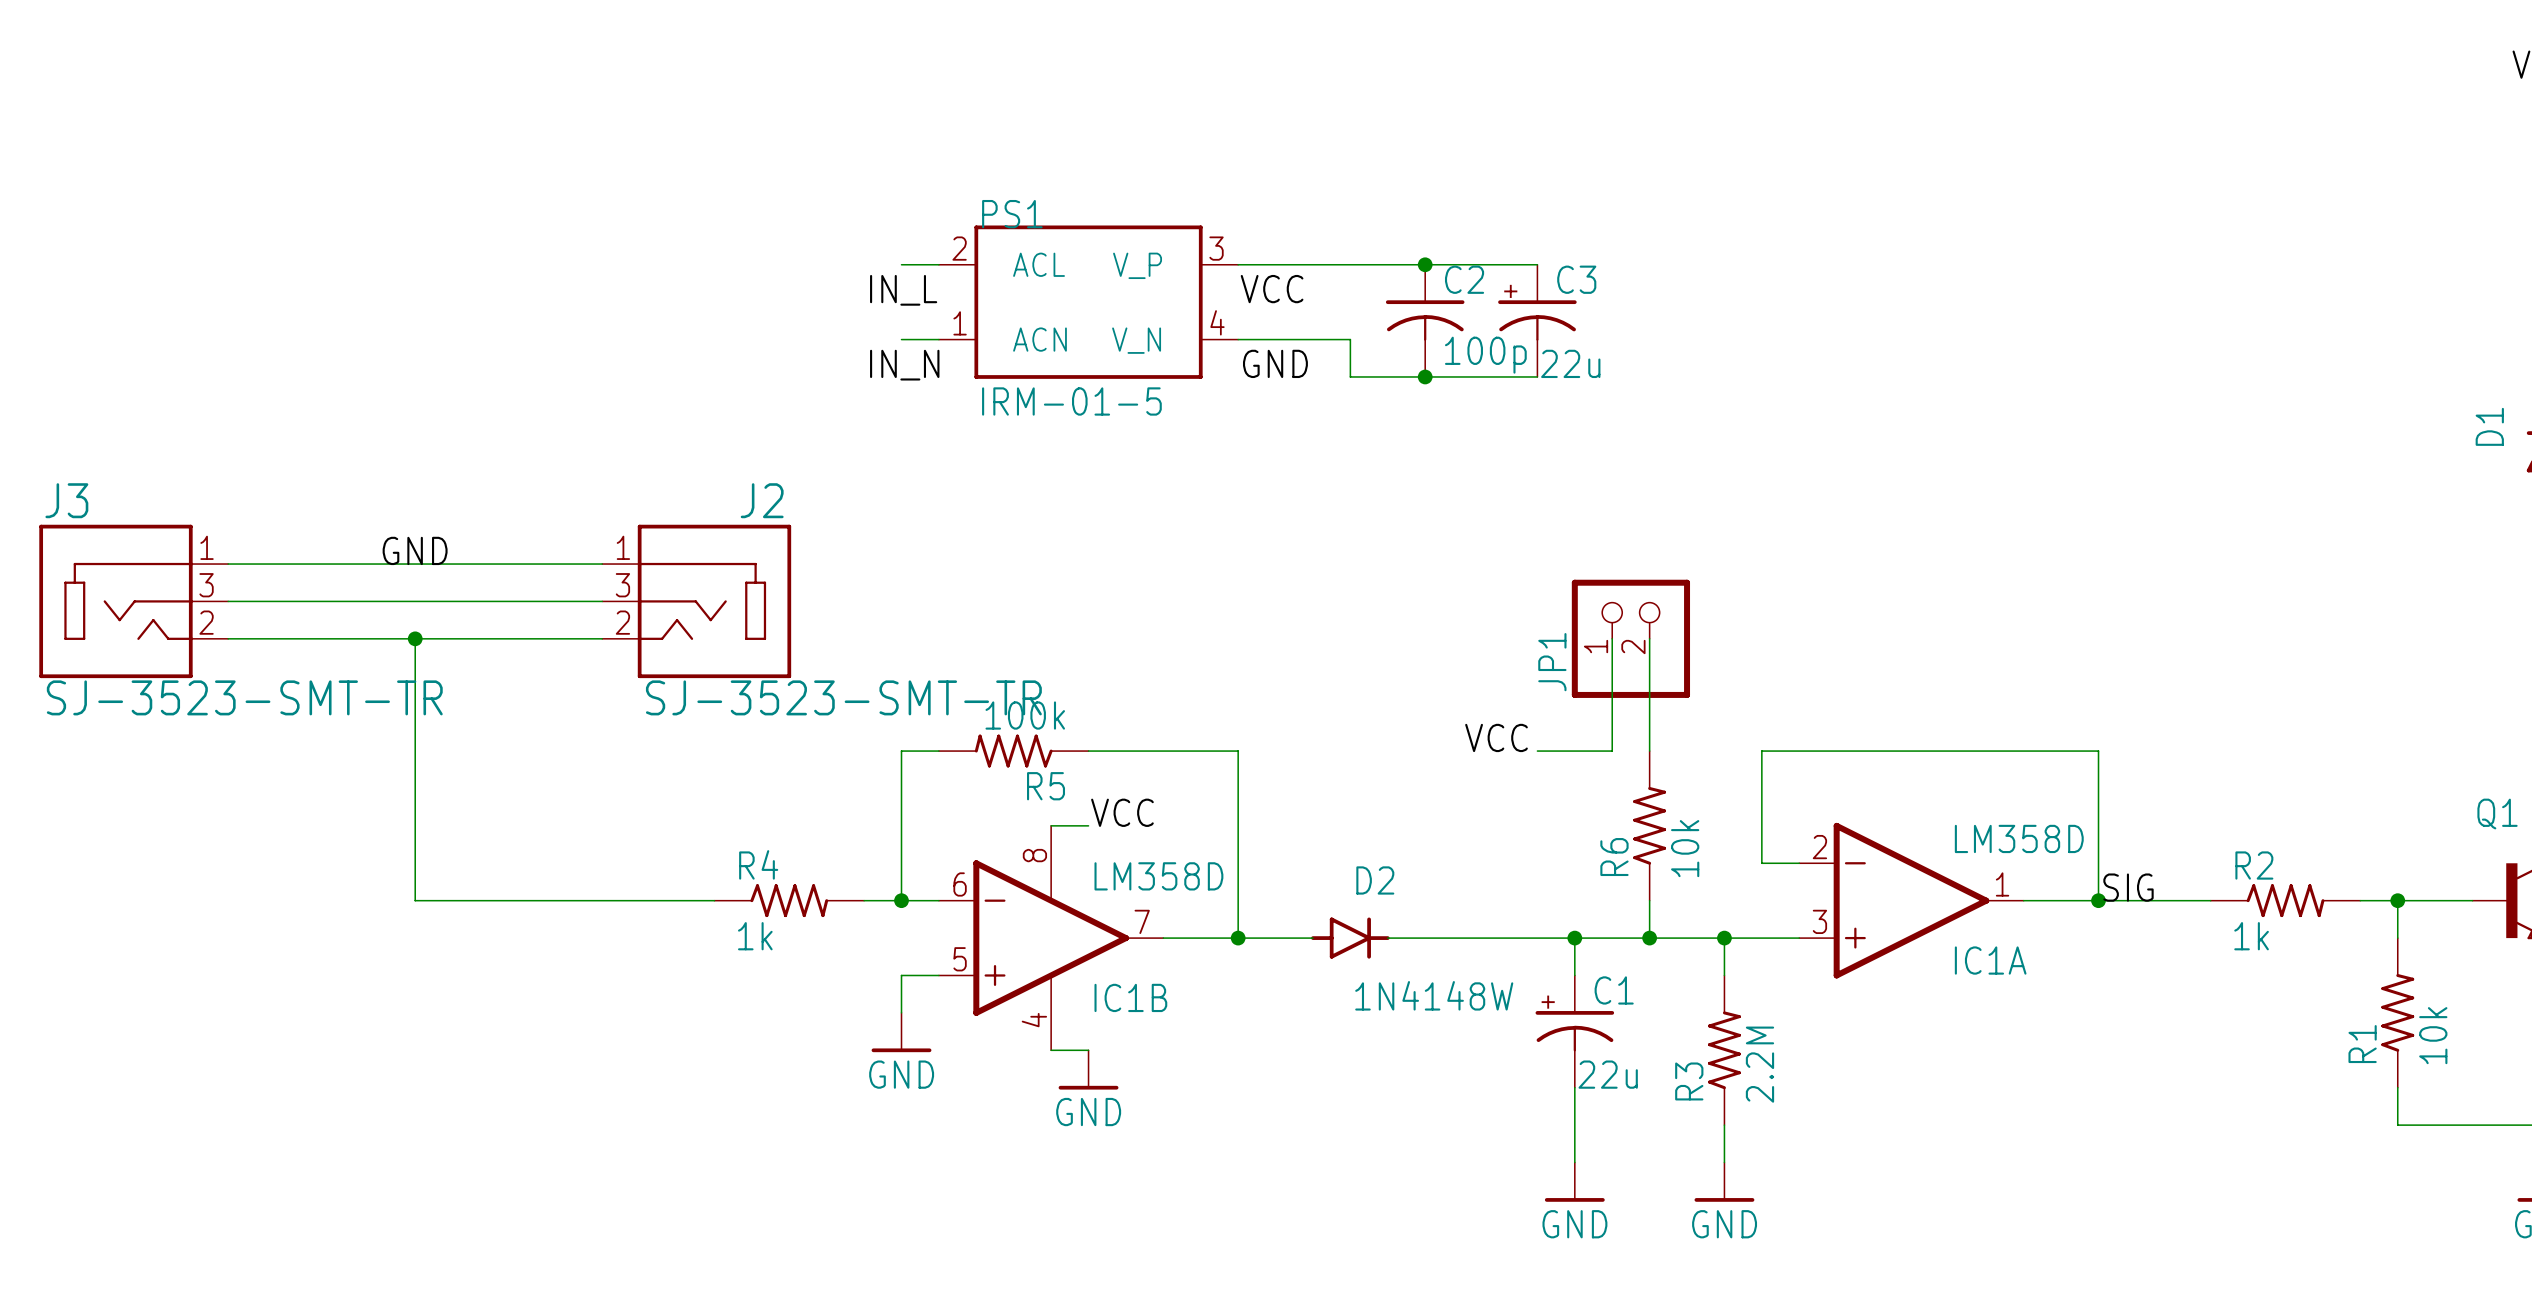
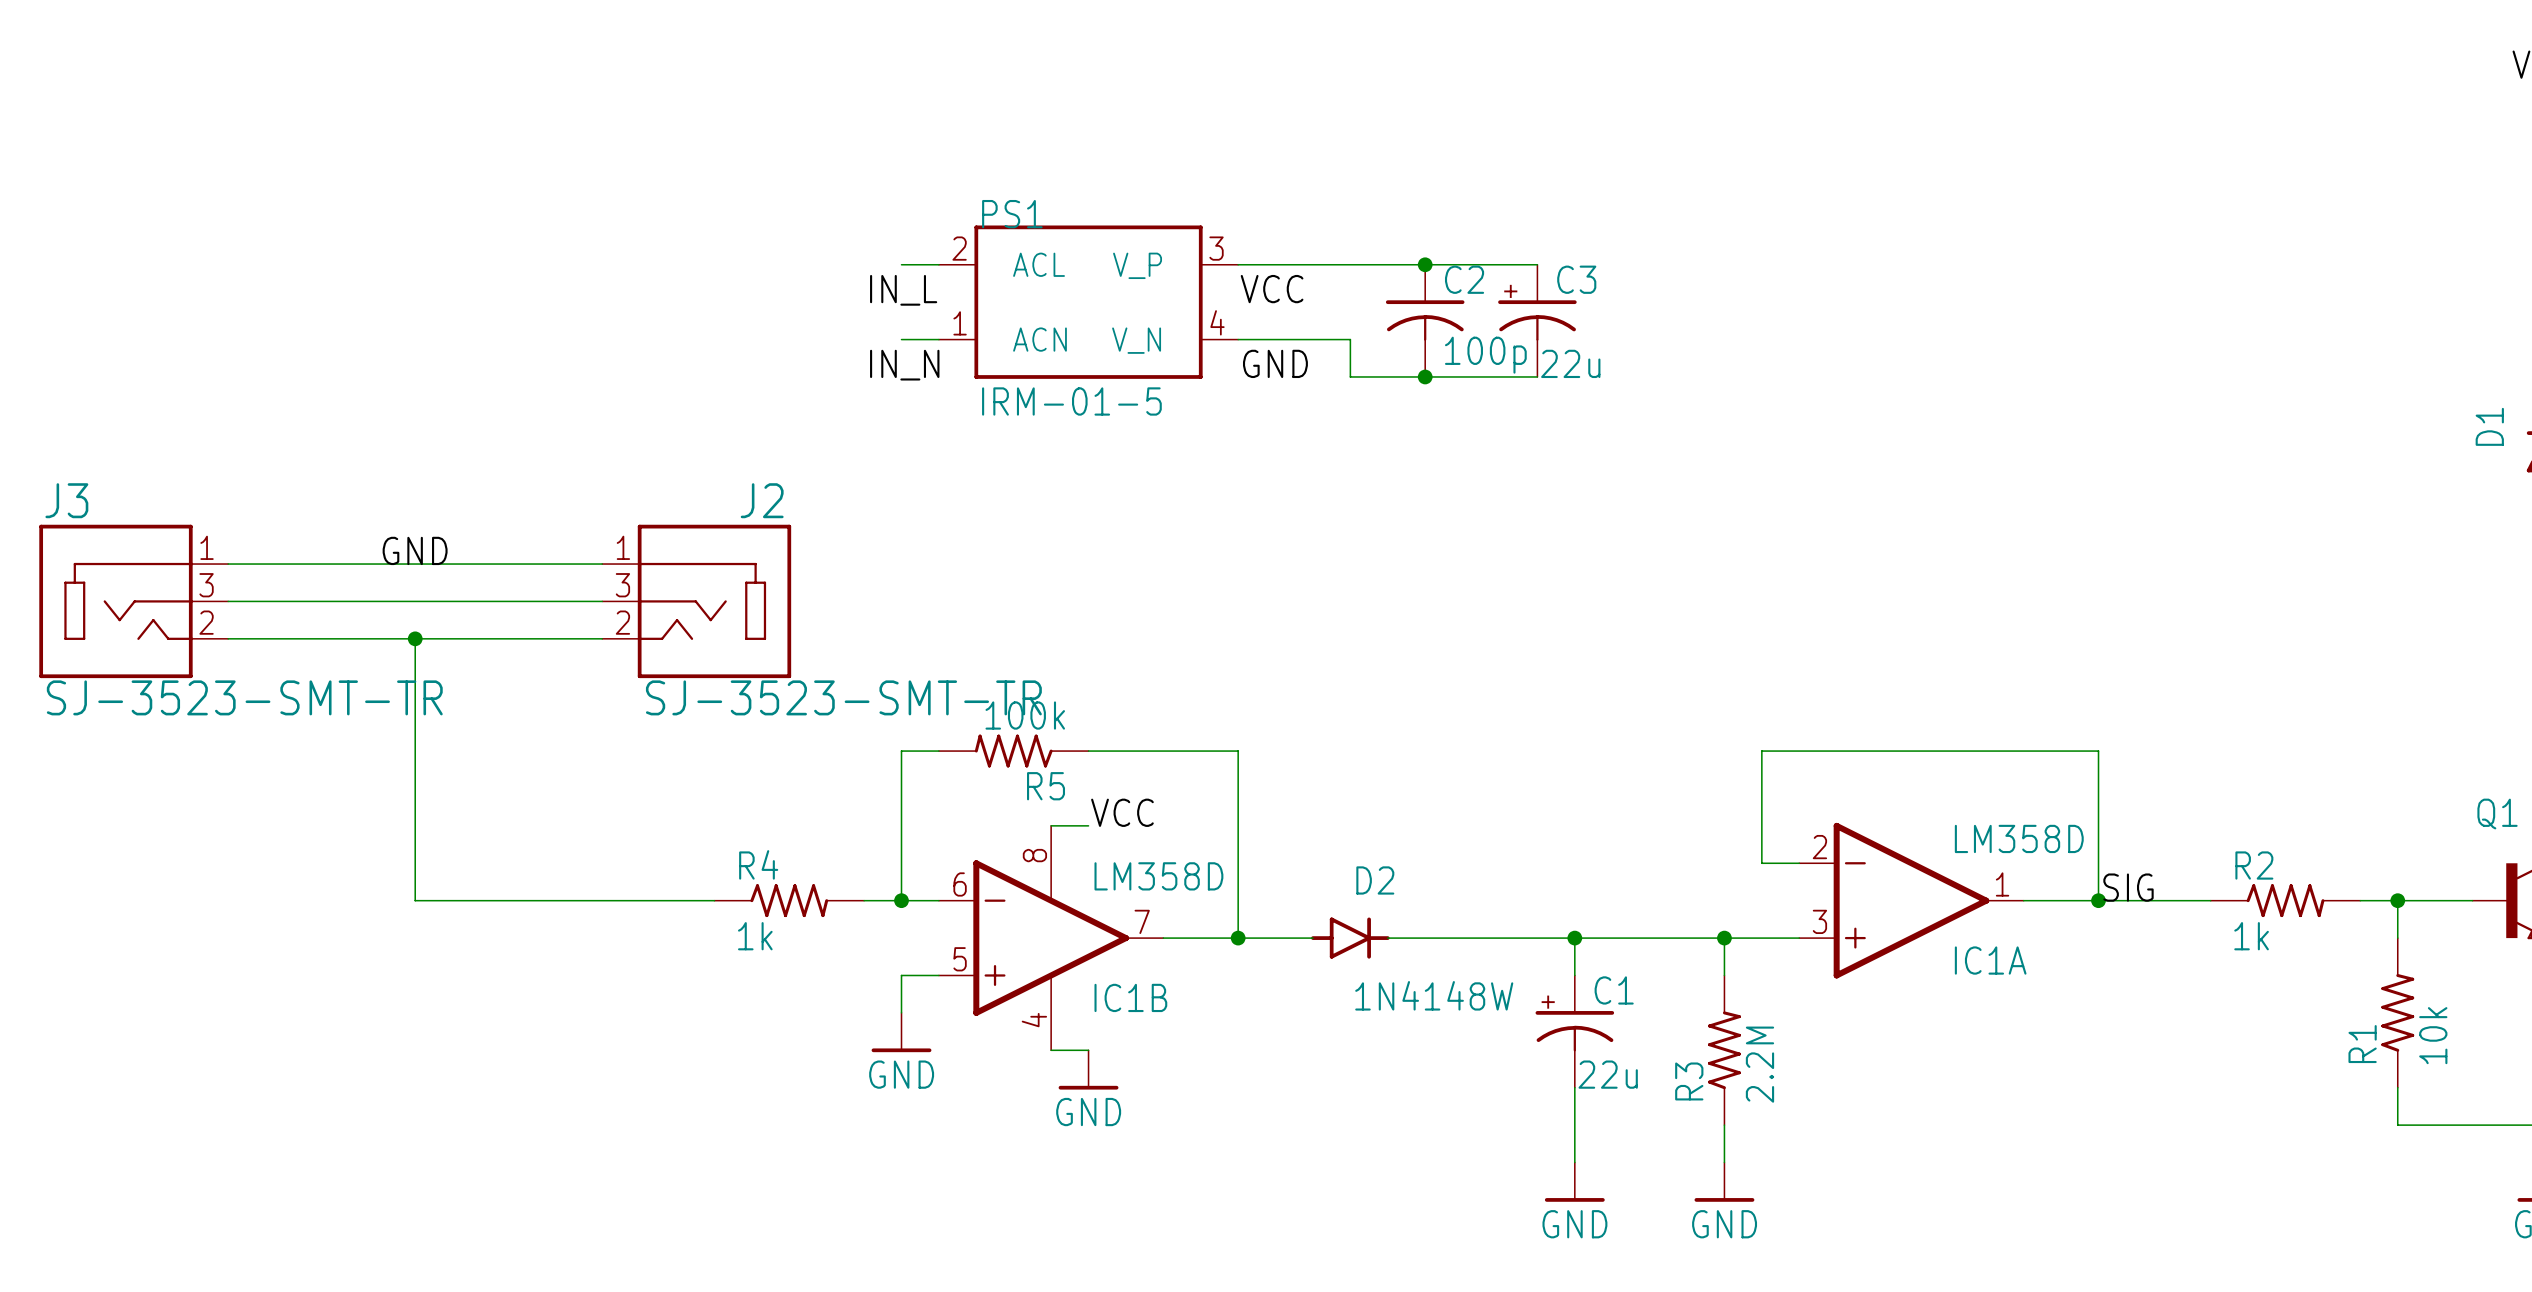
wire: (1612, 638) (1612, 751) (1537, 751) -> none
JP1: (1630, 638) -> none
wire: (1649, 638) (1649, 751) -> none
label: VCC (1496, 737) -> none
R6: 10k (1649, 825) -> none
wire: (1649, 900) (1649, 938) -> none
junction: (1649, 938) -> none

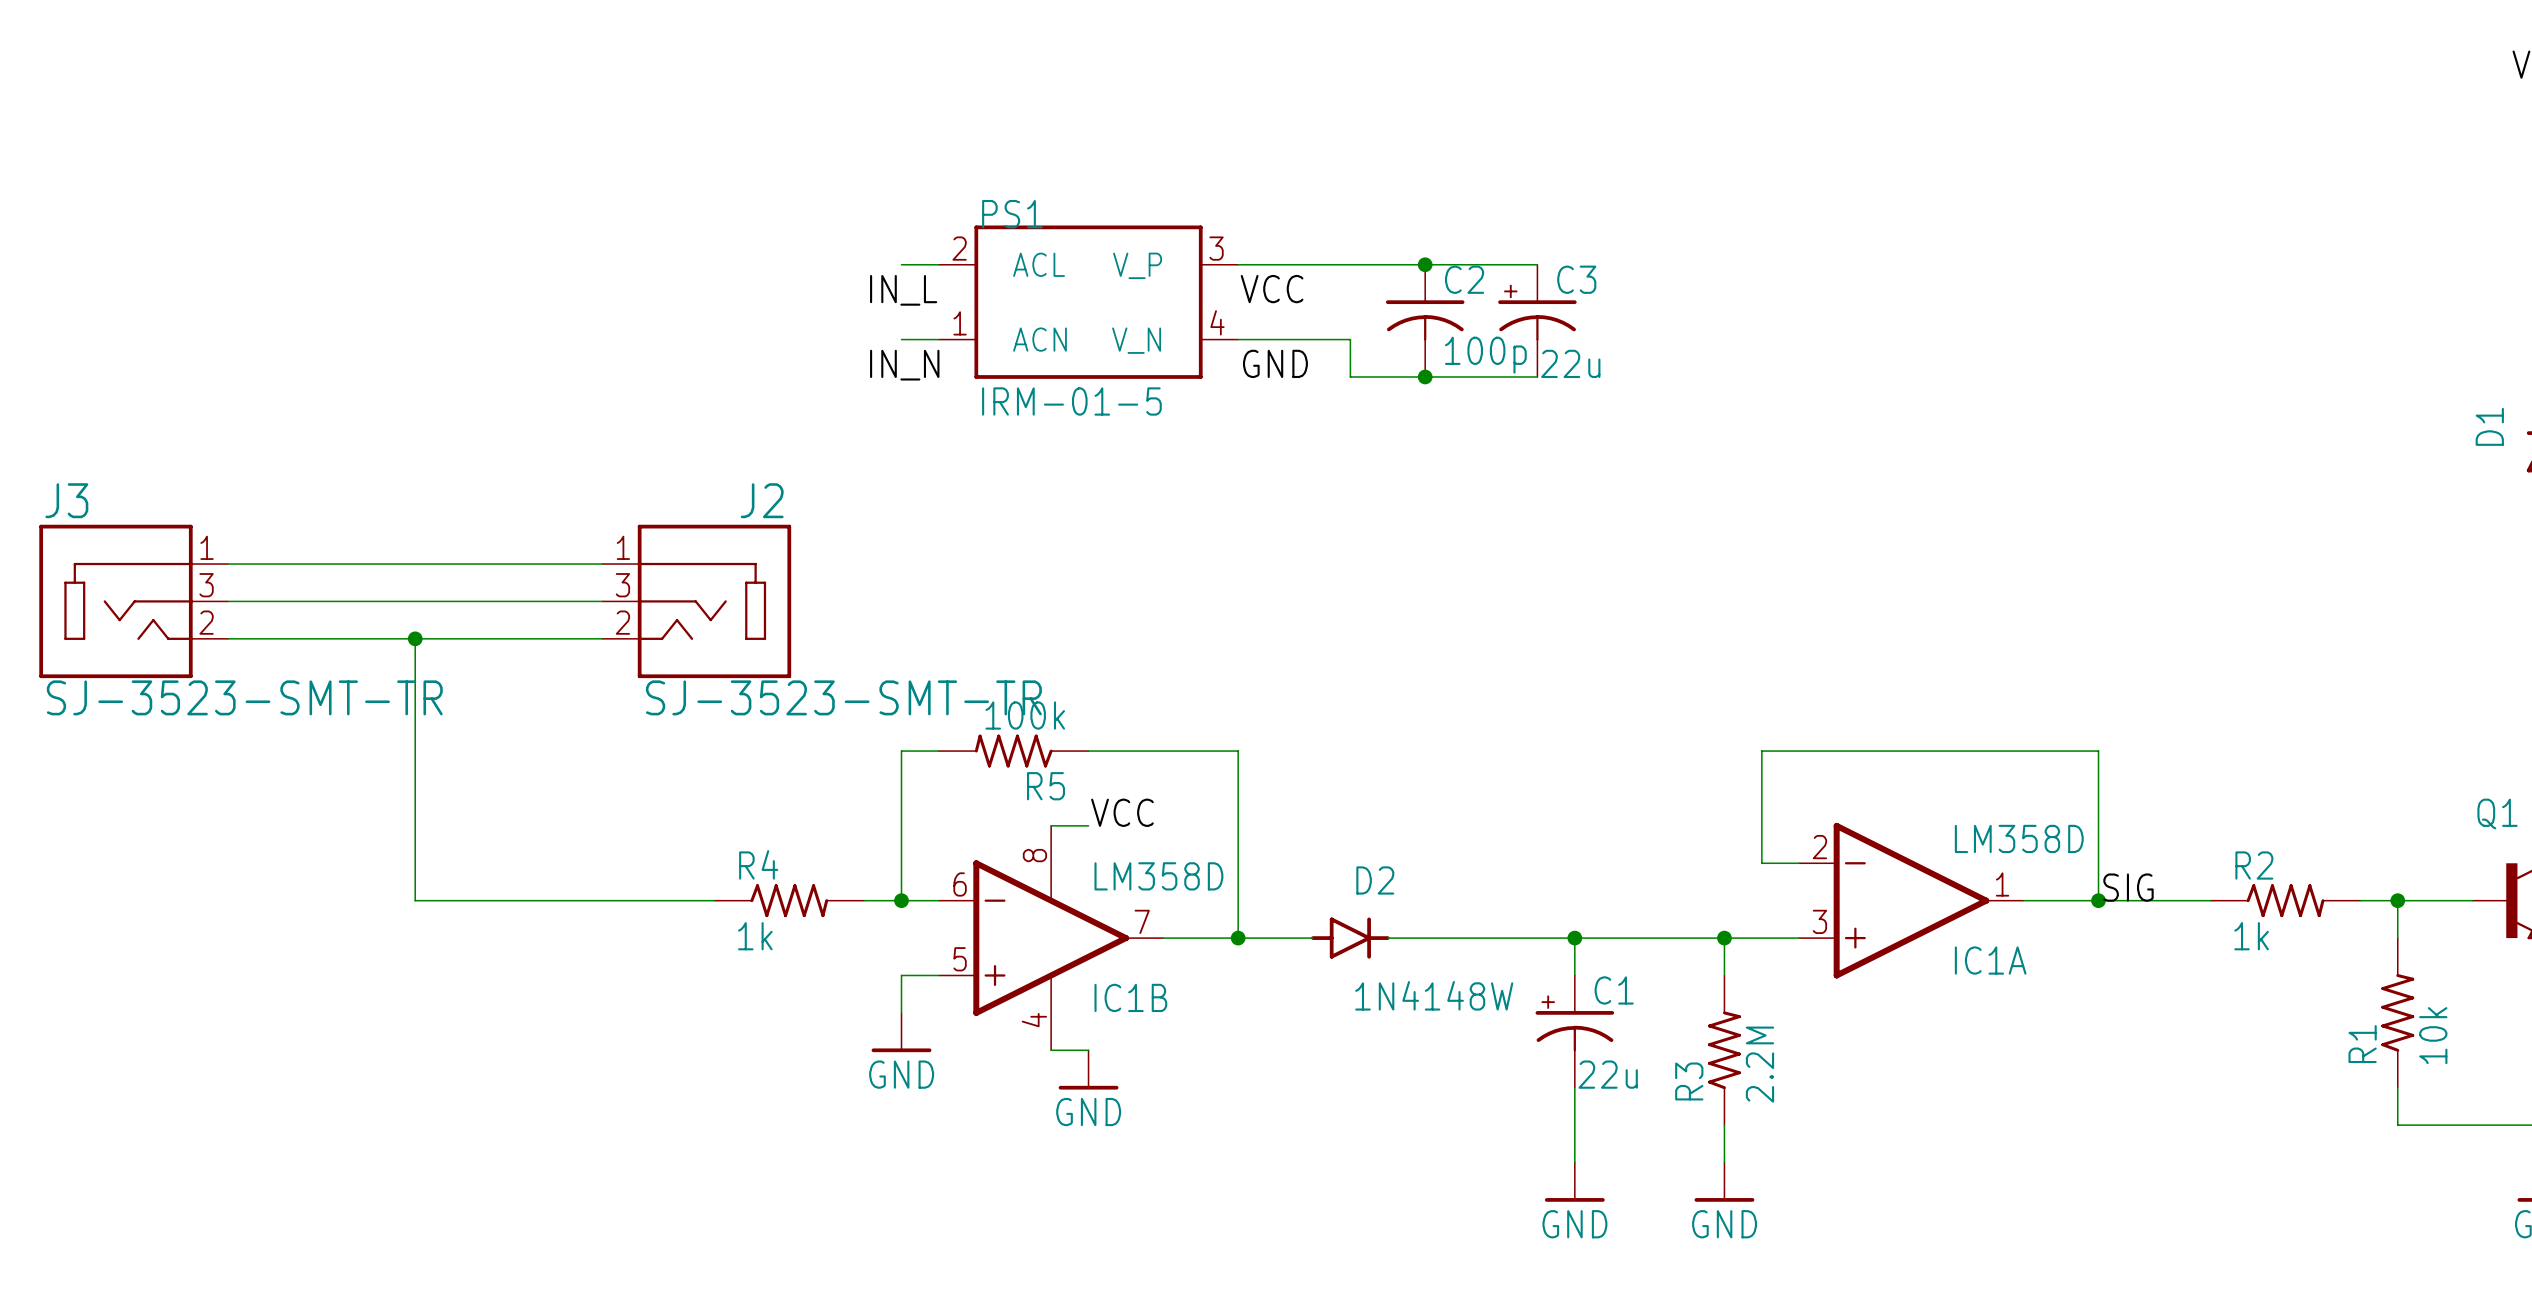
label: GND (415, 550) -> none

